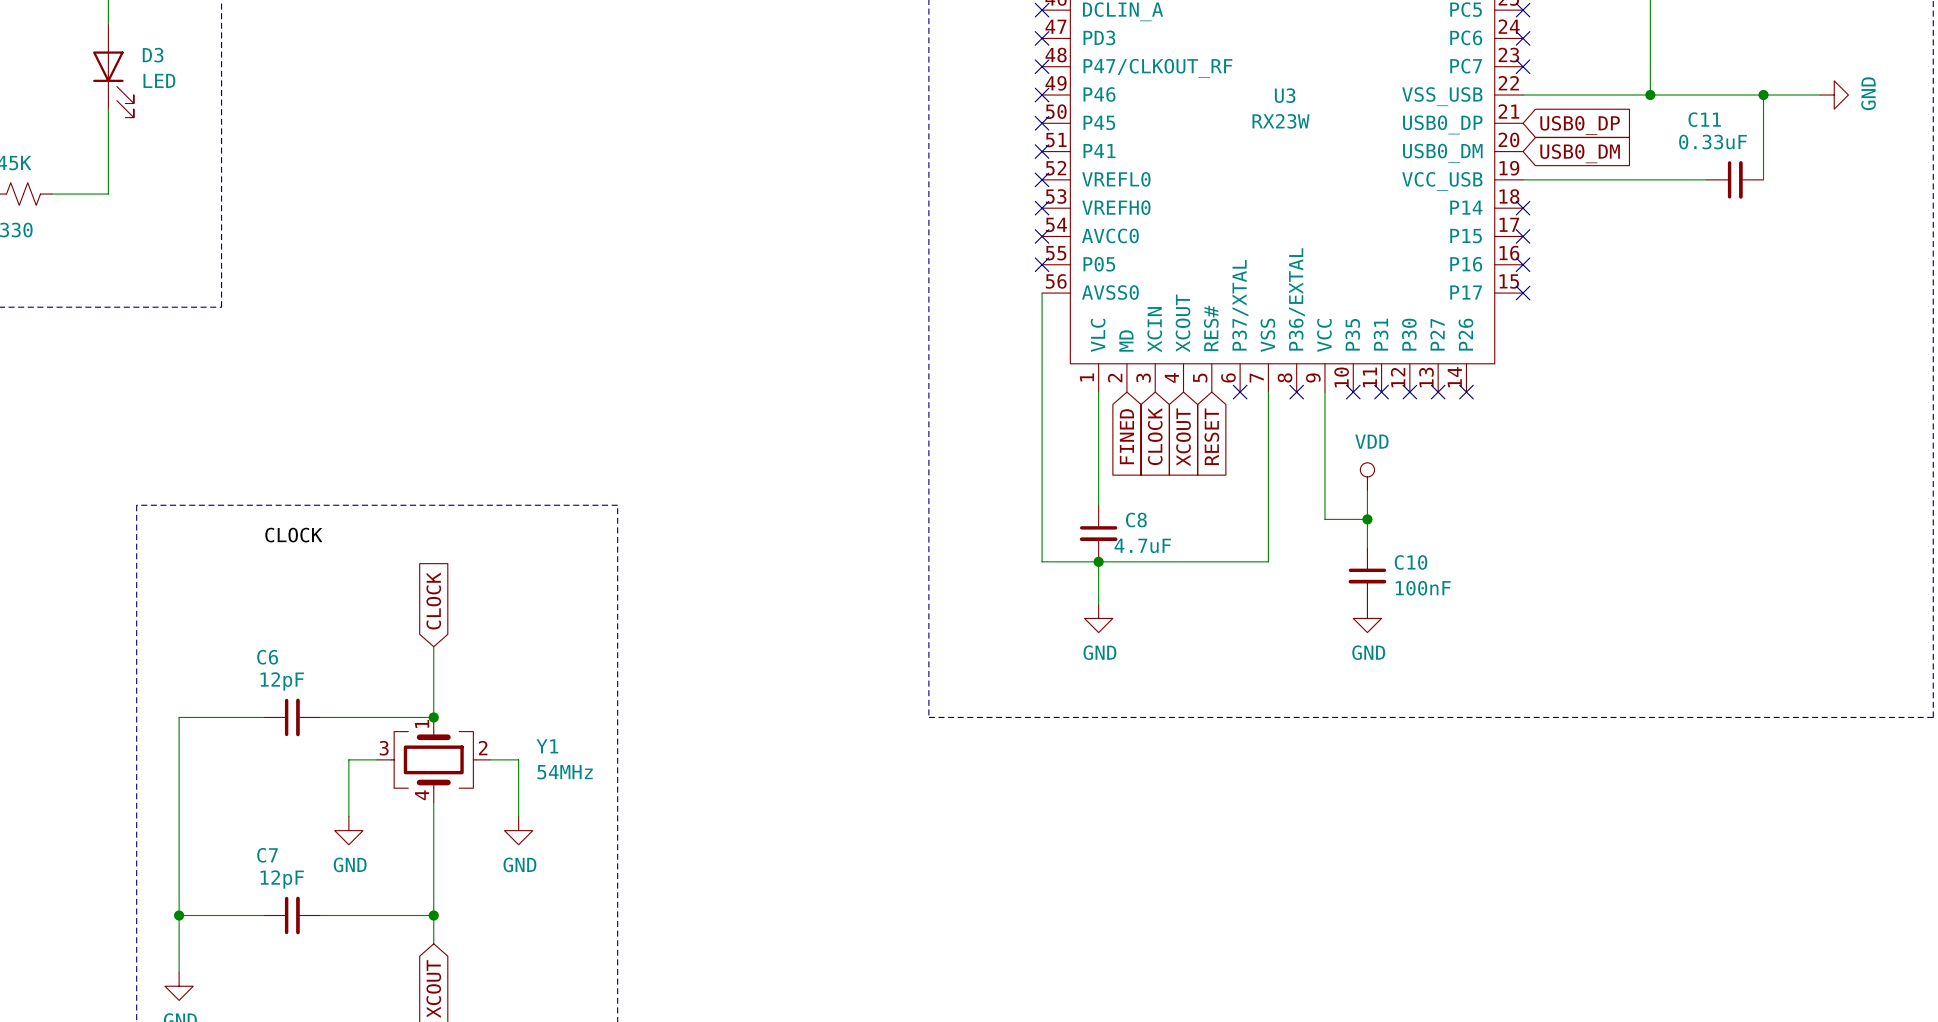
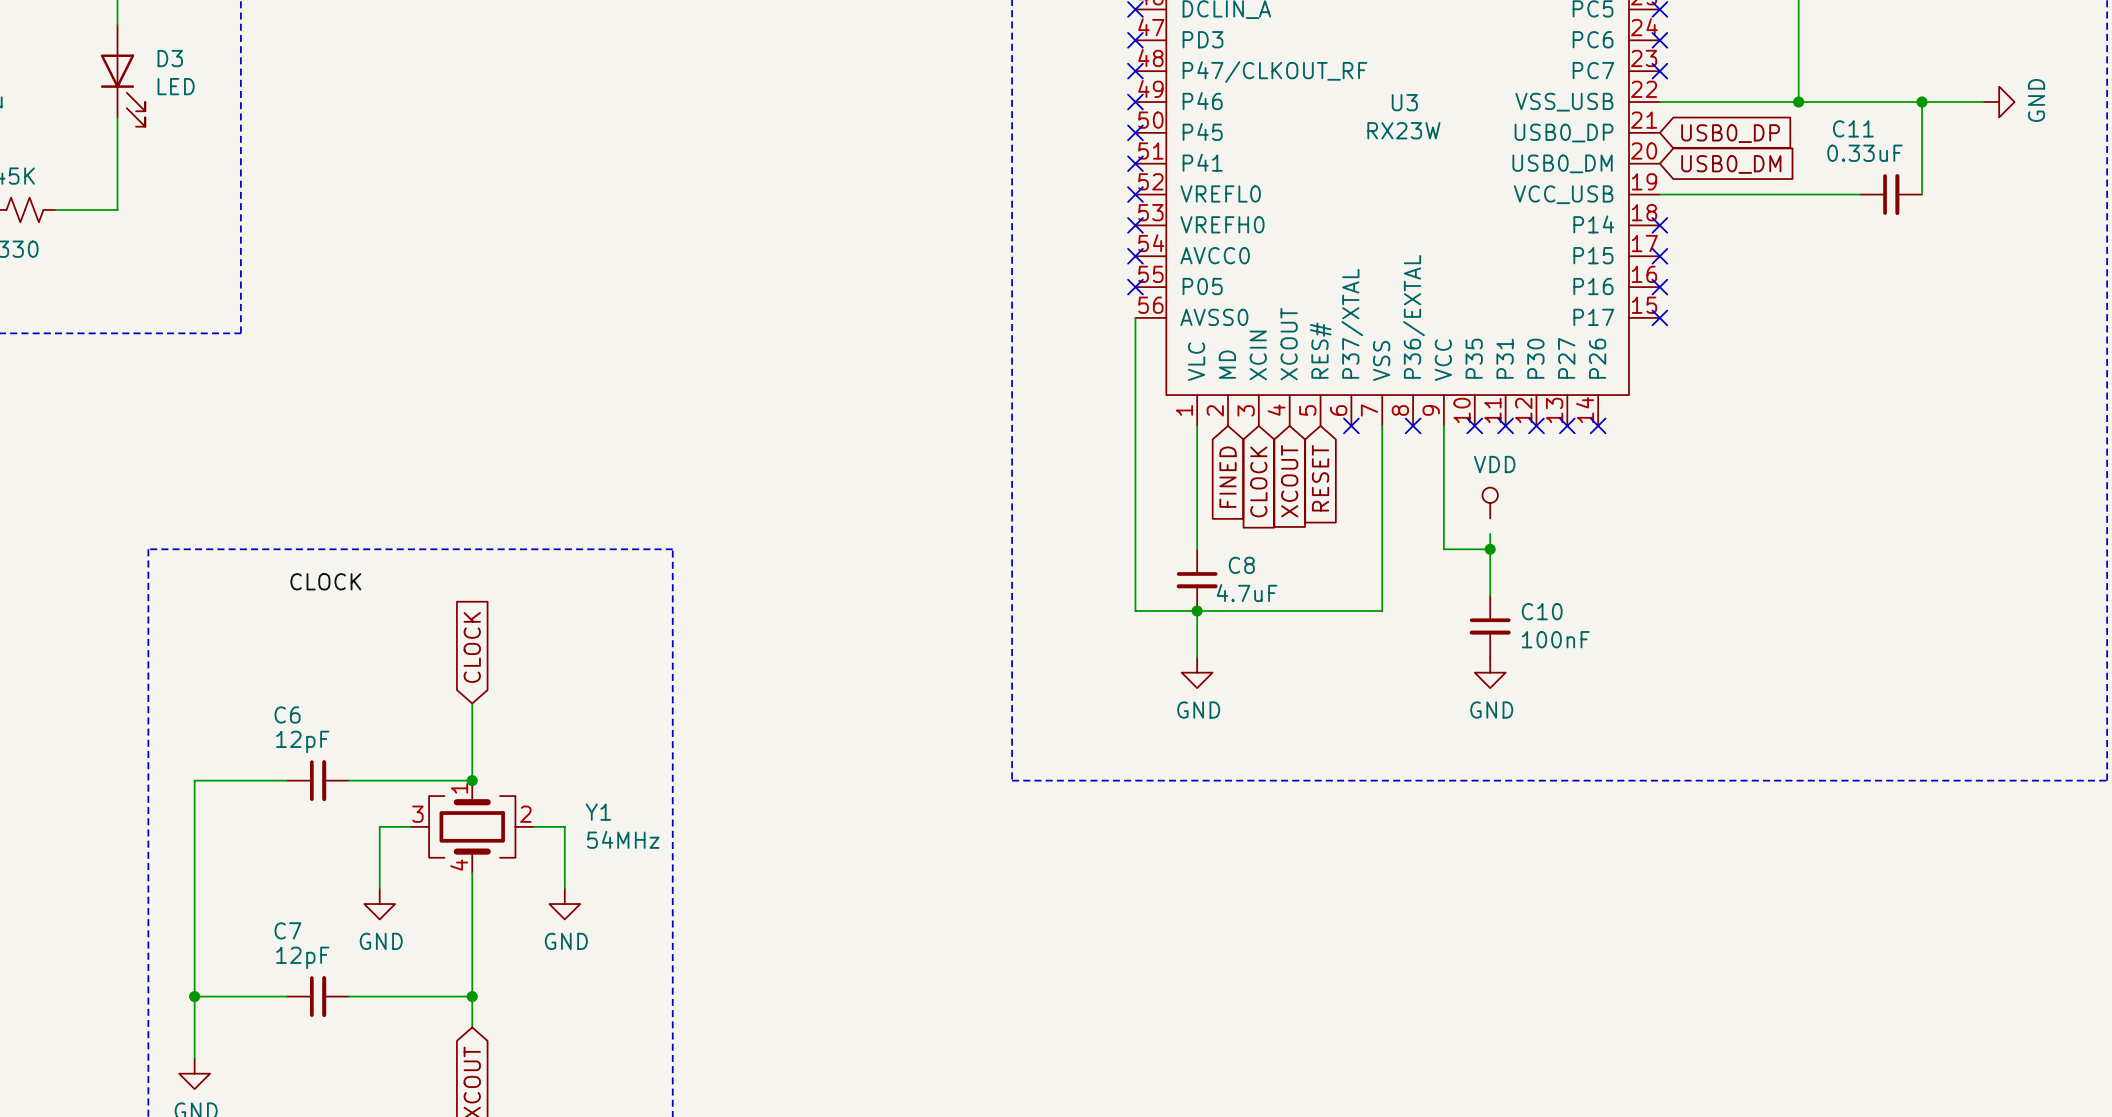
power symbol position: VDD (1367, 476) -> VDD (1490, 503)
wire: (1324, 505) (1324, 519) (1367, 519) -> (1443, 549) (1490, 549)
junction position: (1367, 519) -> (1490, 549)

